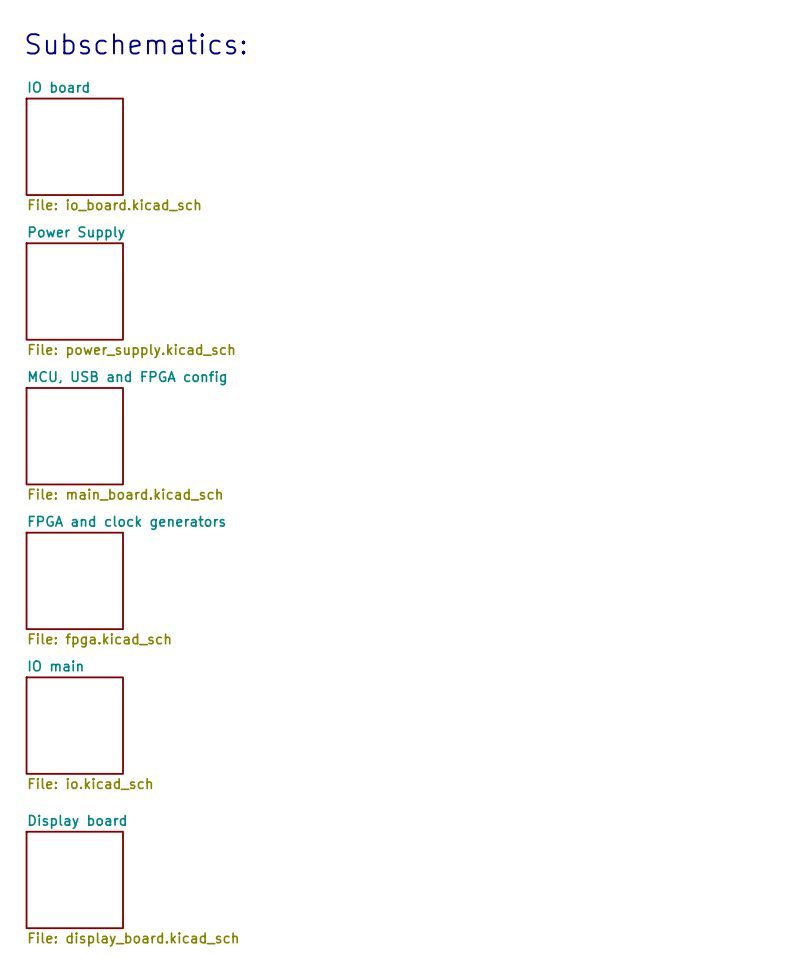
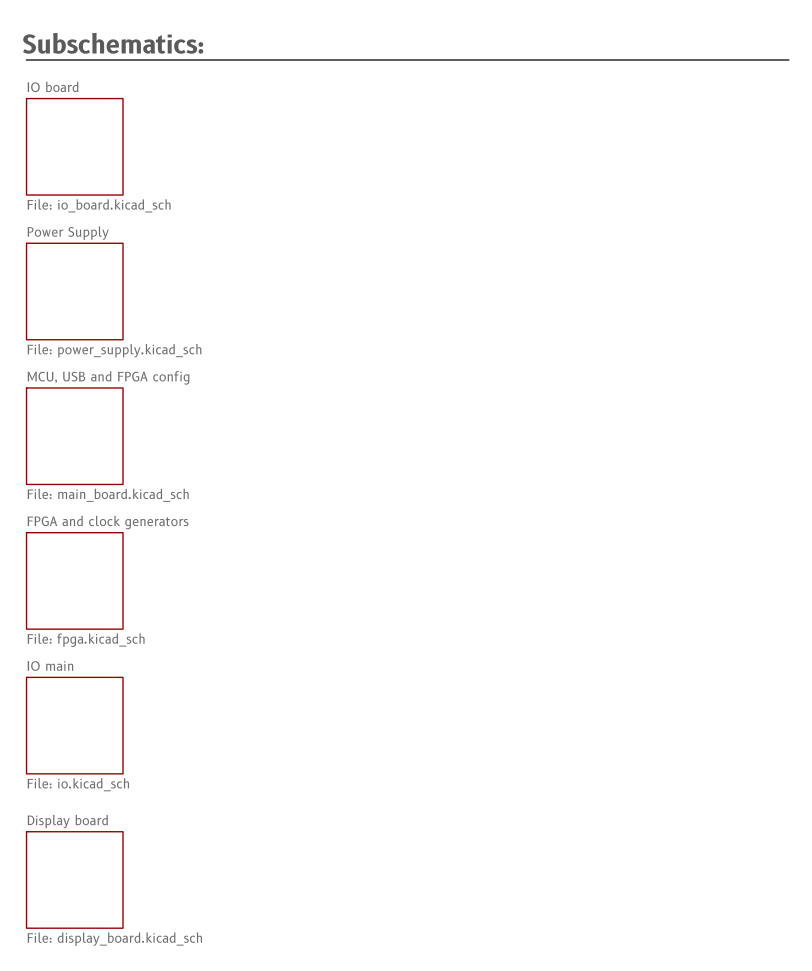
line: none -> (26, 59) (788, 59)

